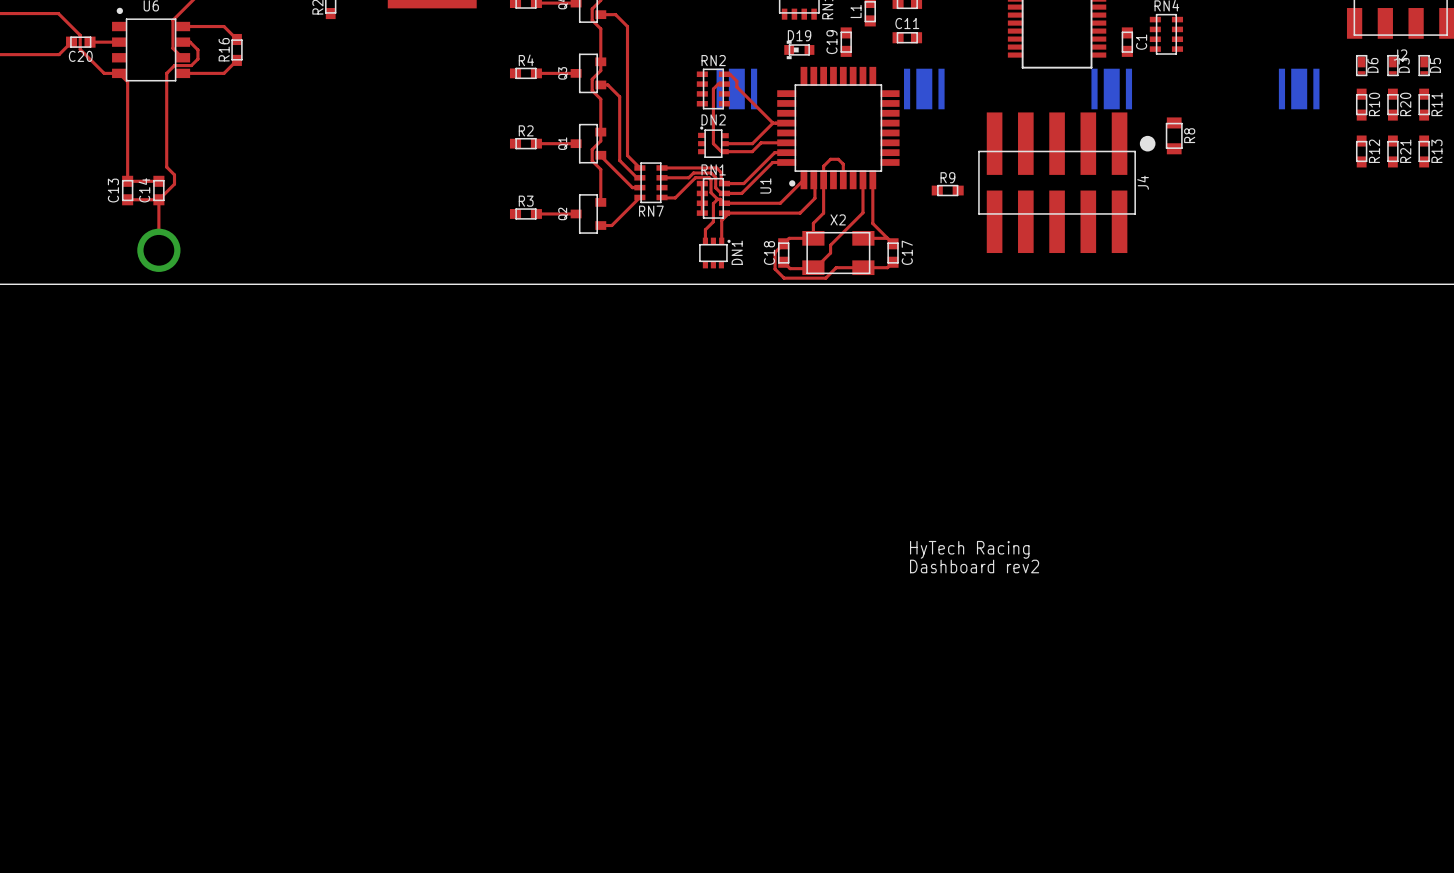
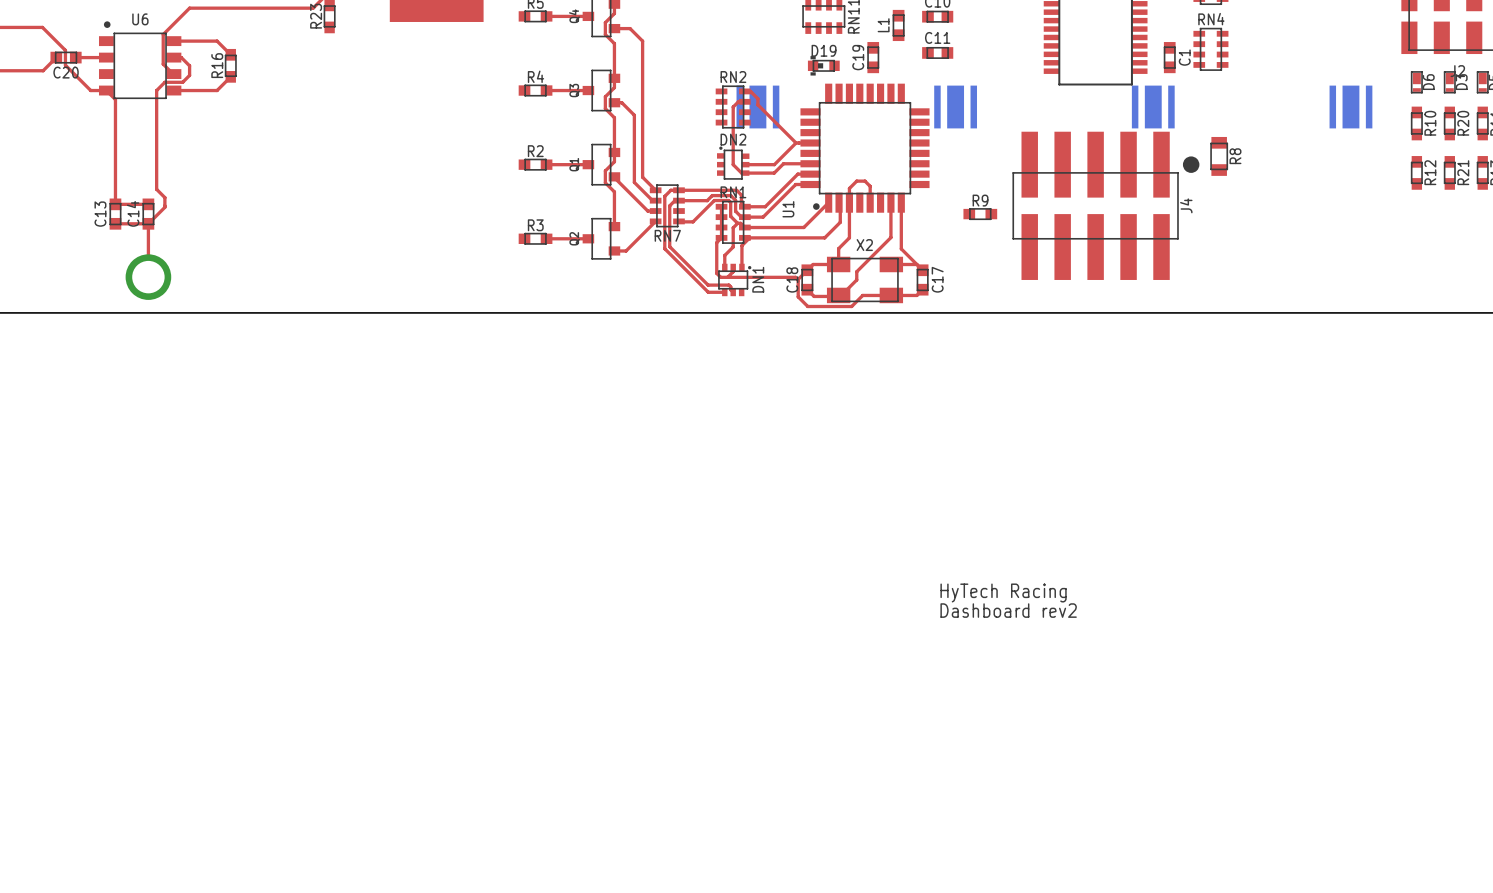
top track: none -> (678, 190) (670, 190) (664, 196) (664, 248) (708, 292) (724, 292)
top track: none -> (678, 200) (674, 200) (669, 205) (669, 246) (708, 285) (728, 285) (733, 292)
top track: none -> (721, 237) (716, 242) (716, 273) (720, 277) (795, 277) (798, 279)
top track: none -> (733, 267) (733, 271) (727, 277)

